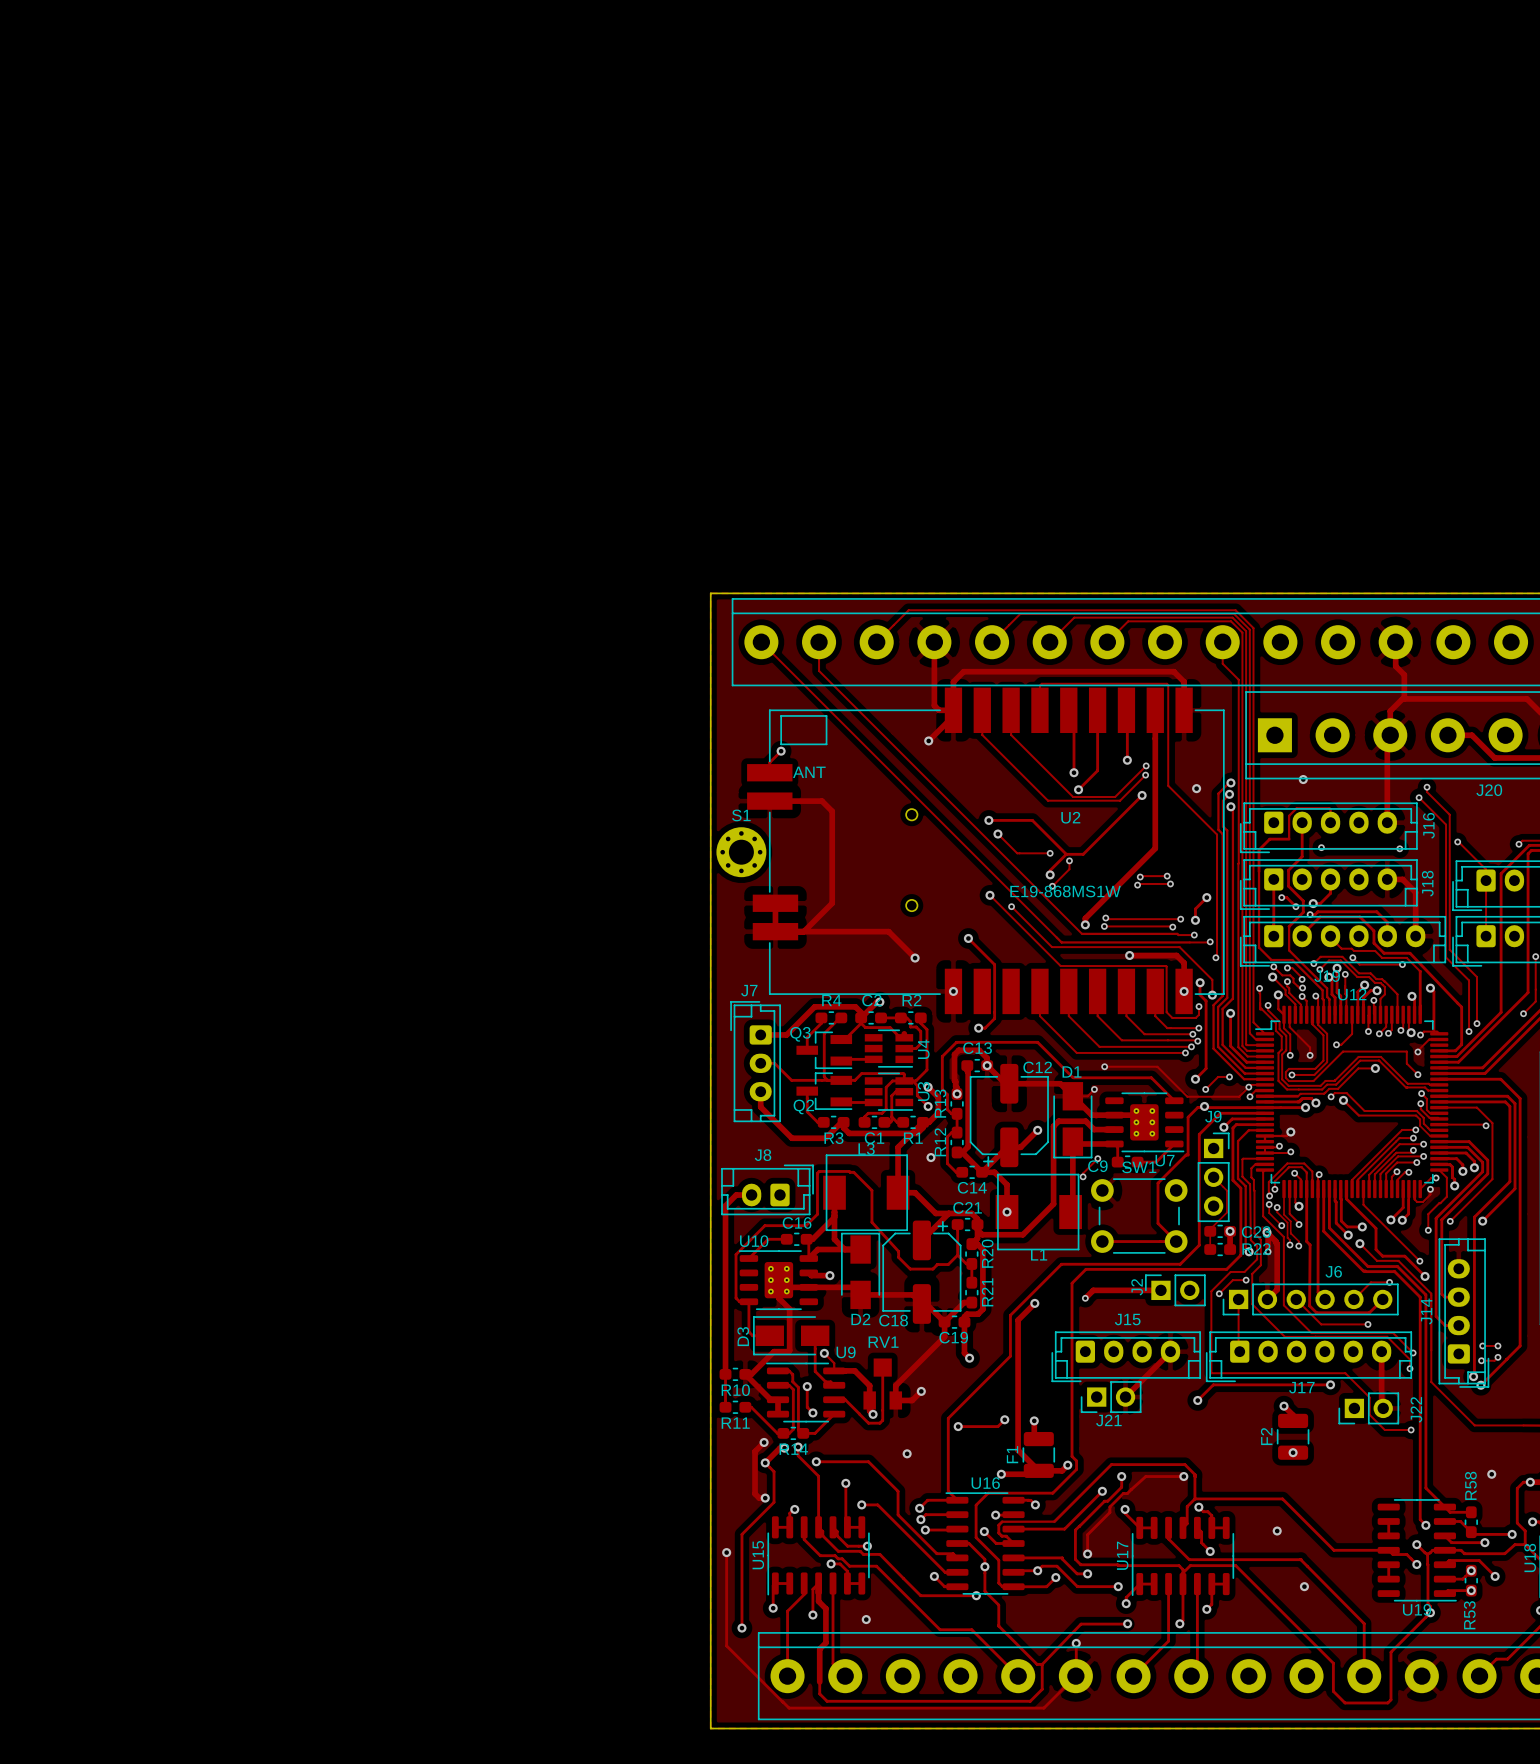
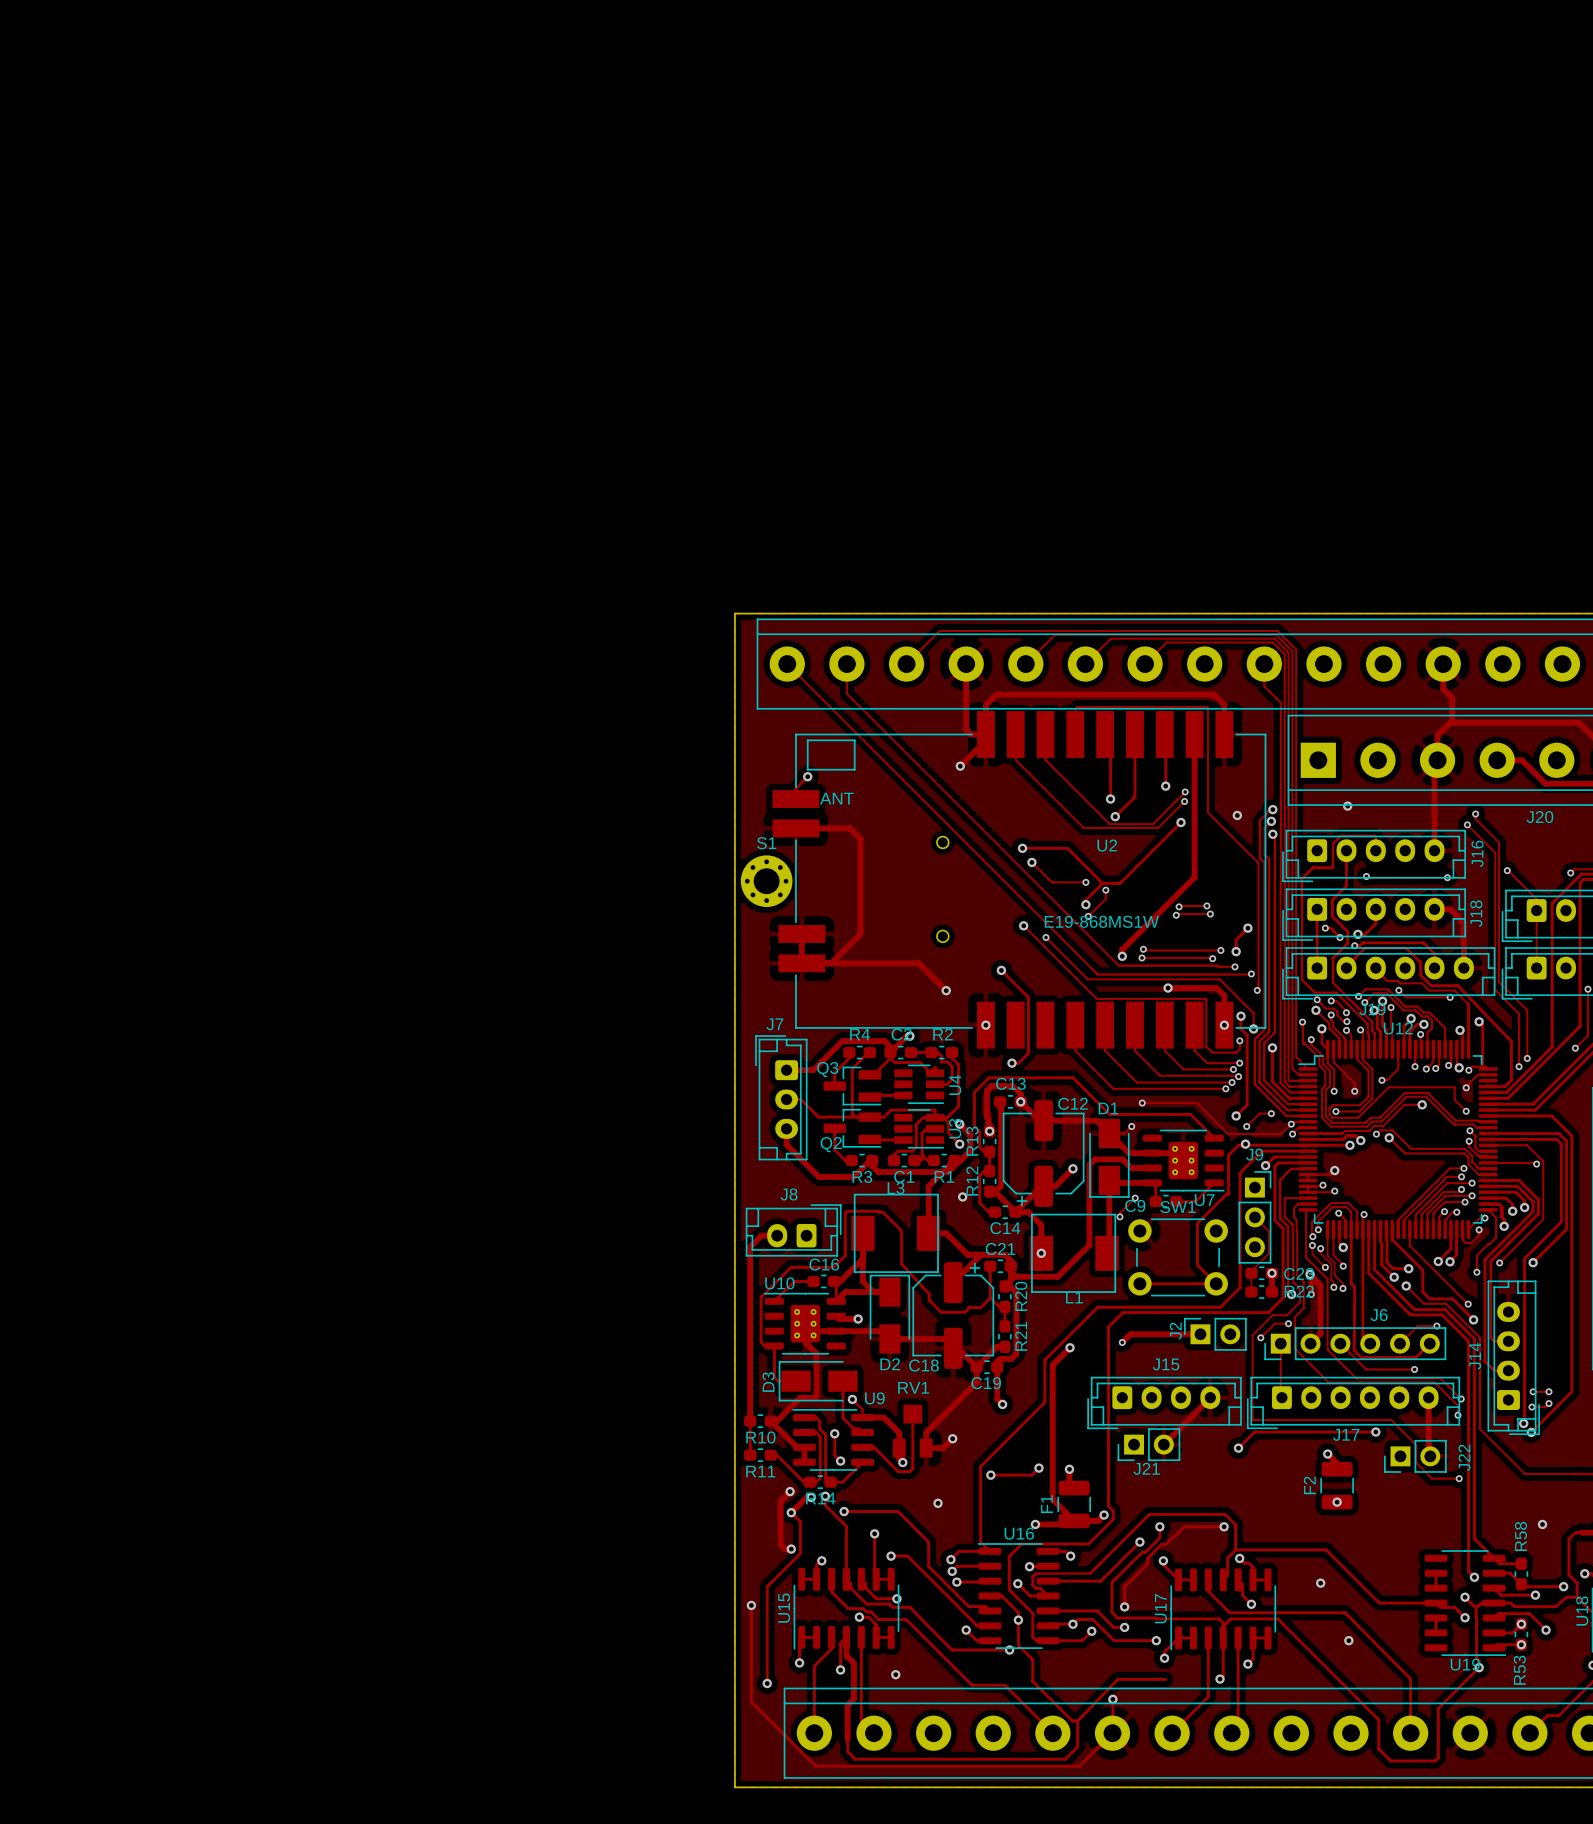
via: (1530, 1482) -> none
via: (1127, 1623) -> none

